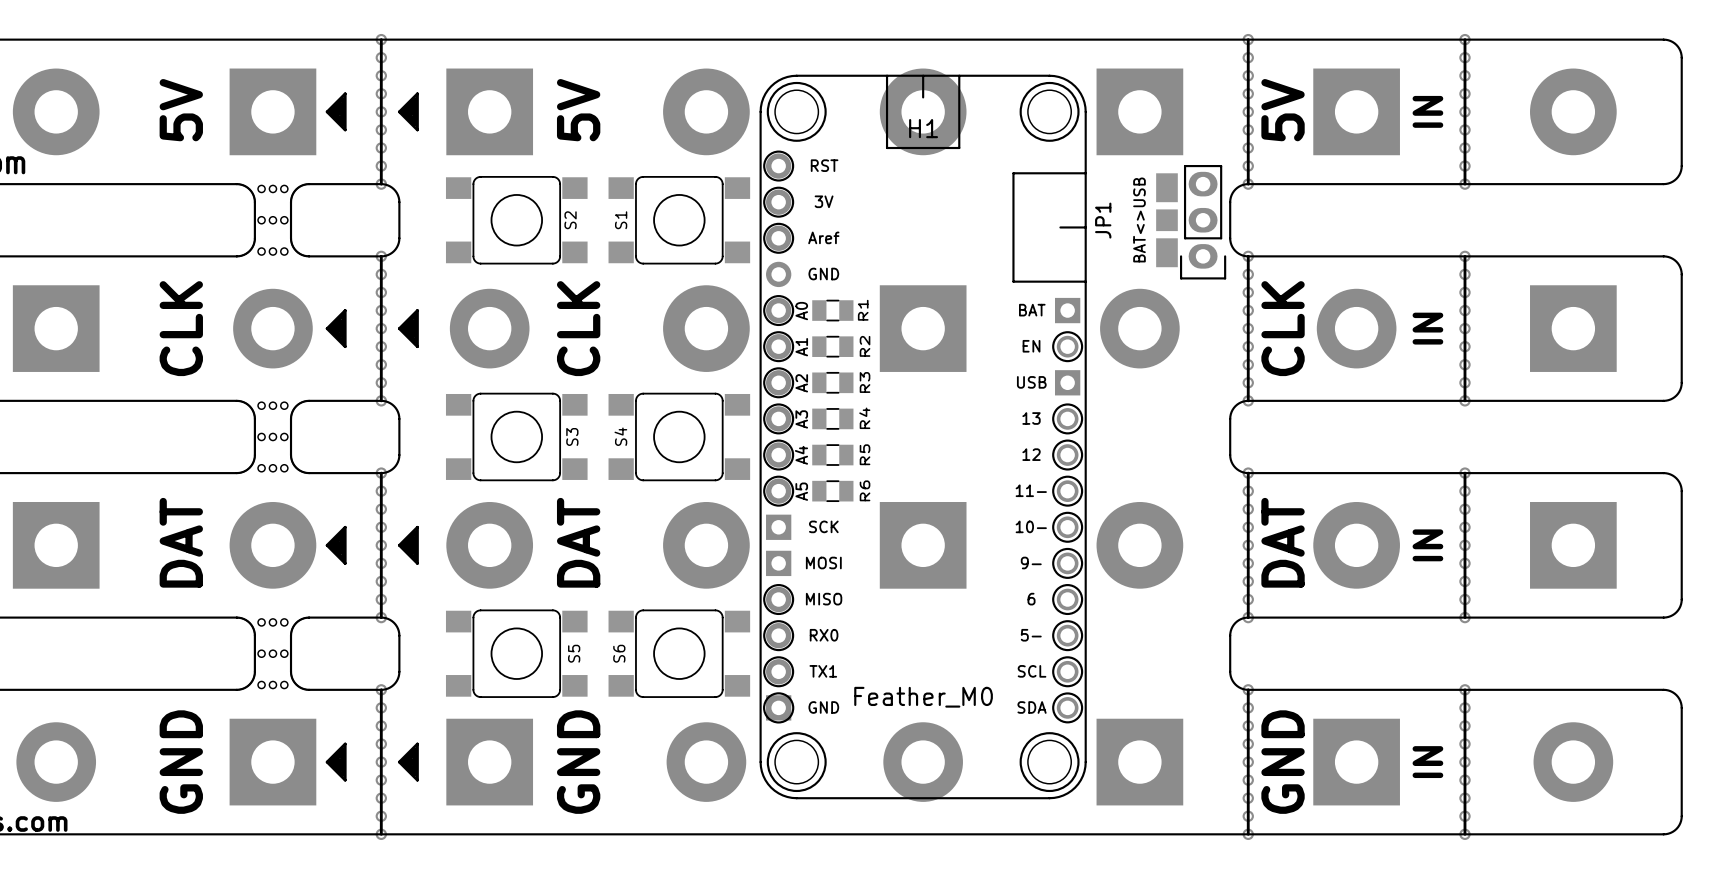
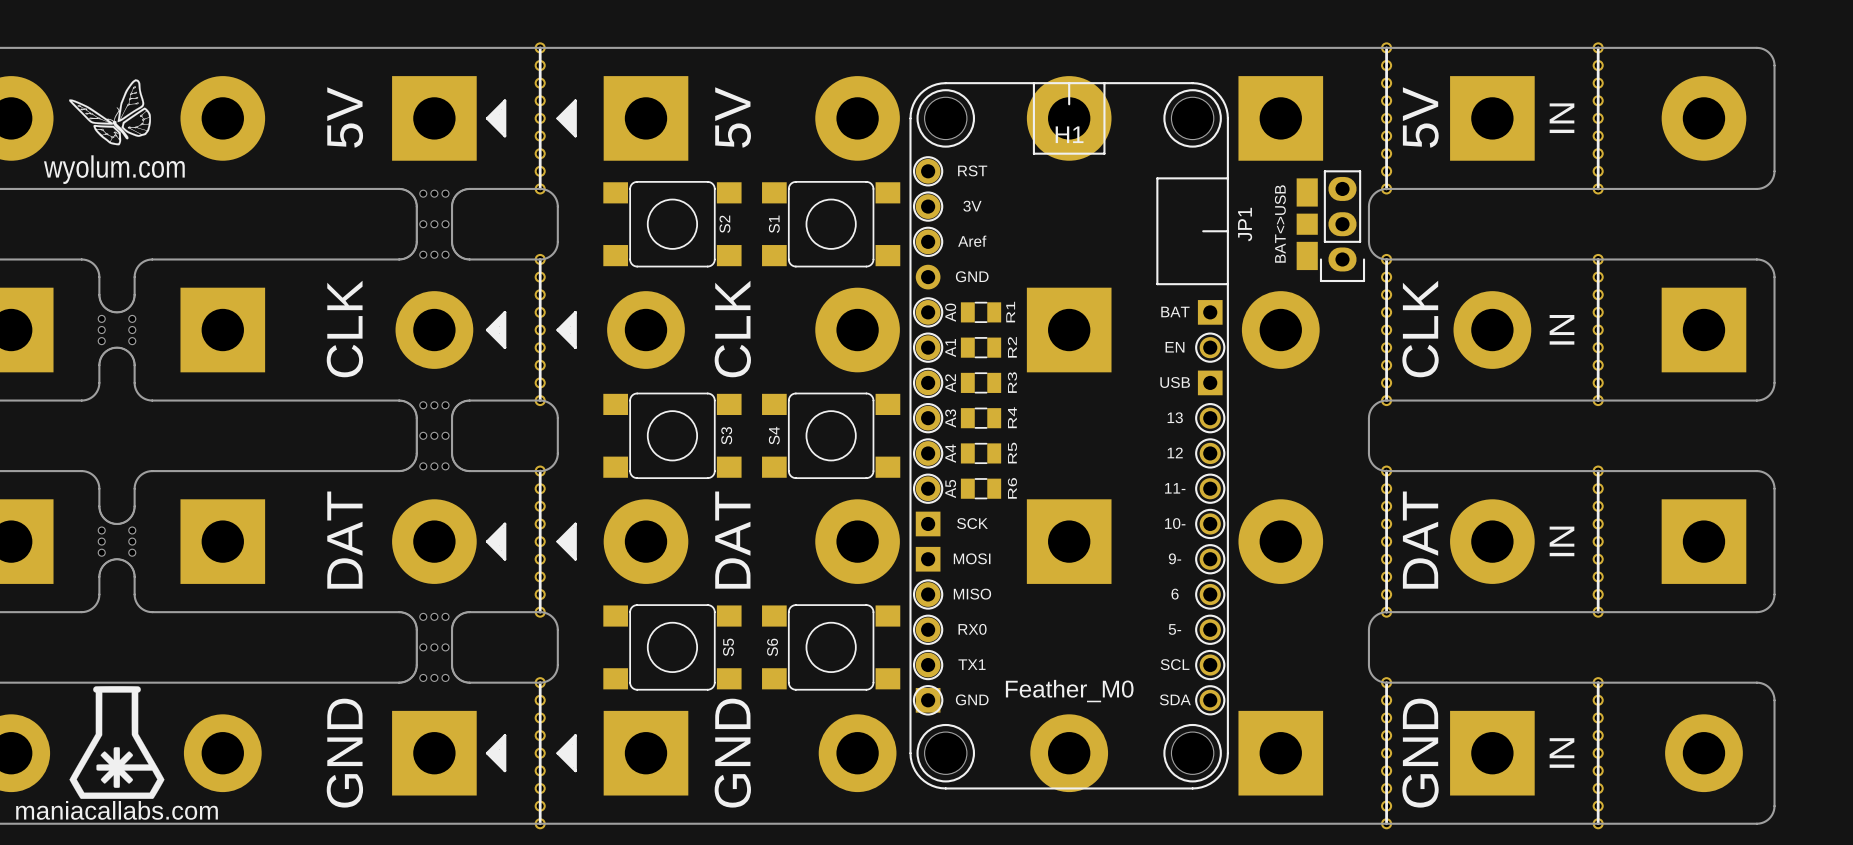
board edge: (1627, 39) (1668, 40) (1677, 46) (1681, 57) (1680, 172) (1674, 180) (1668, 183) (1627, 184) -> (1756, 47) (1769, 53) (1774, 65) (1774, 173) (1767, 185) (1756, 188)
board edge: (1627, 256) (1668, 256) (1676, 261) (1680, 267) (1681, 382) (1677, 393) (1668, 400) (1627, 400) -> (1756, 259) (1769, 264) (1774, 277) (1774, 385) (1767, 396) (1756, 400)
board edge: (1627, 473) (1668, 473) (1676, 478) (1680, 484) (1681, 599) (1677, 610) (1668, 616) (1627, 617) -> (1756, 471) (1769, 476) (1774, 488) (1774, 596) (1767, 608) (1756, 612)
board edge: (1627, 689) (1668, 690) (1676, 695) (1680, 700) (1681, 816) (1677, 827) (1668, 833) (1627, 834) -> (1756, 682) (1769, 687) (1774, 700) (1774, 808) (1767, 820) (1756, 823)

